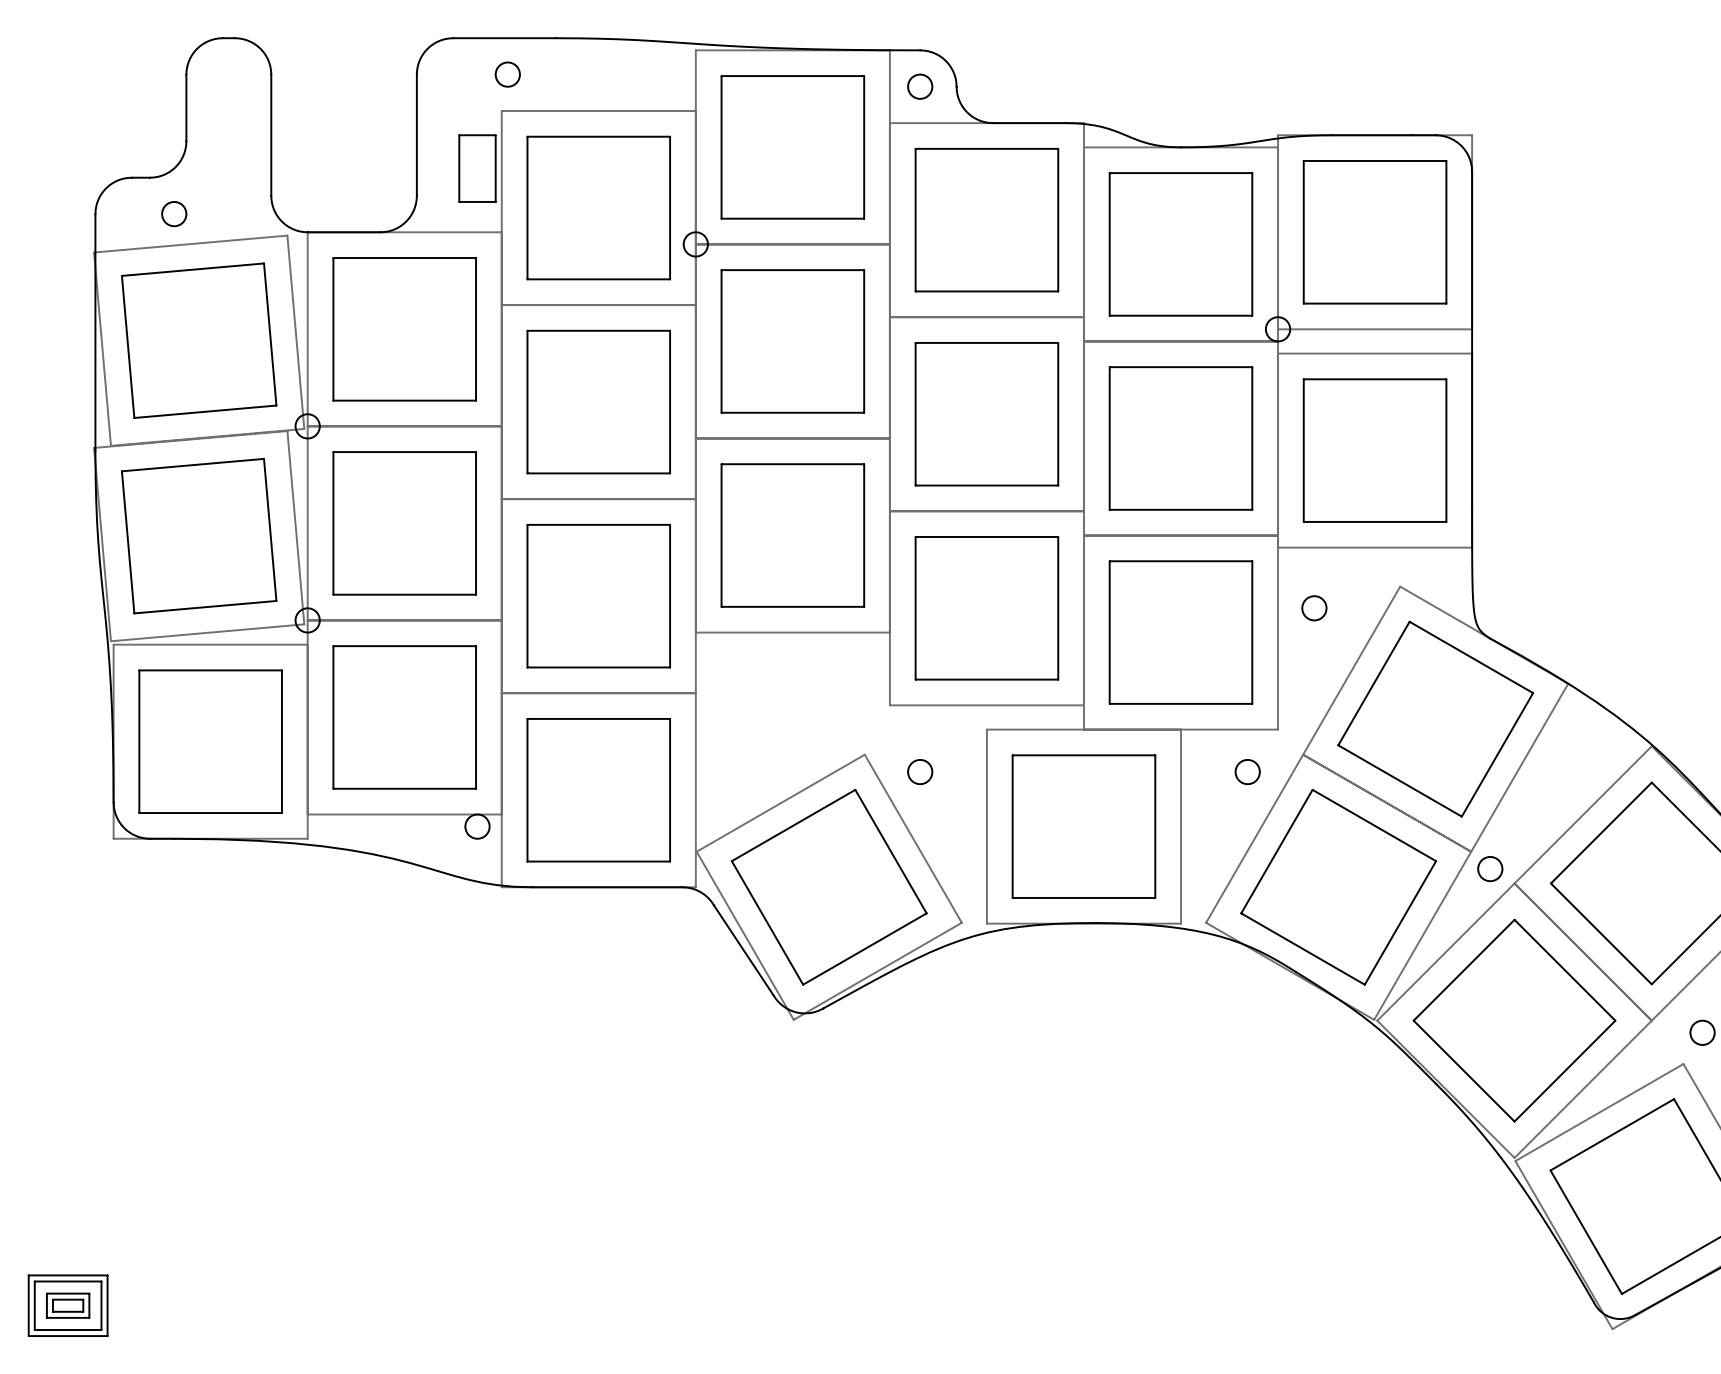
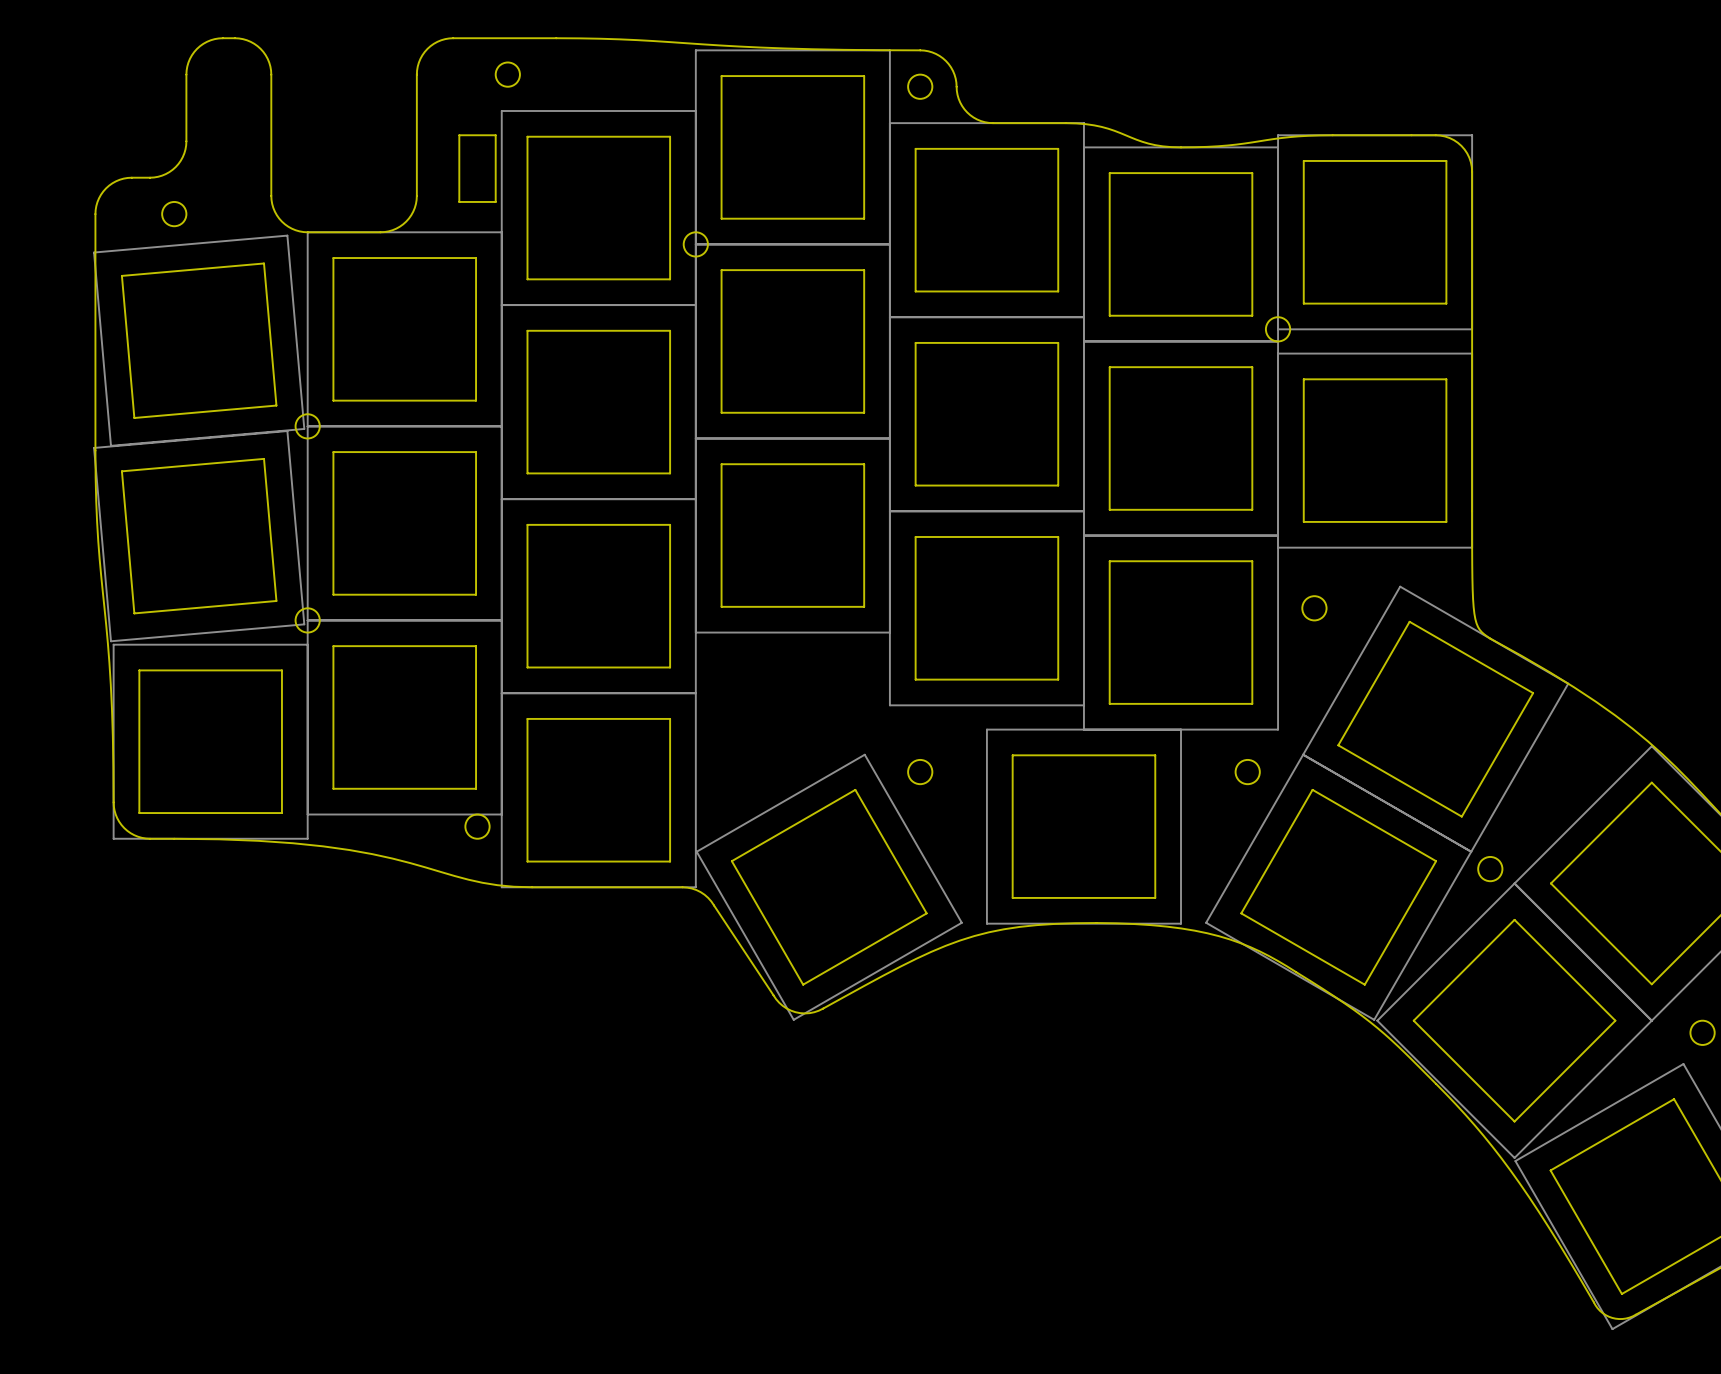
board edge: (28, 1275) (107, 1275) (107, 1336) (28, 1336) (28, 1275) -> none
board edge: (34, 1281) (101, 1281) (101, 1330) (34, 1330) (34, 1281) -> none
board edge: (46, 1293) (89, 1293) (89, 1317) (46, 1317) (46, 1293) -> none
board edge: (52, 1299) (83, 1299) (83, 1311) (52, 1311) (52, 1299) -> none

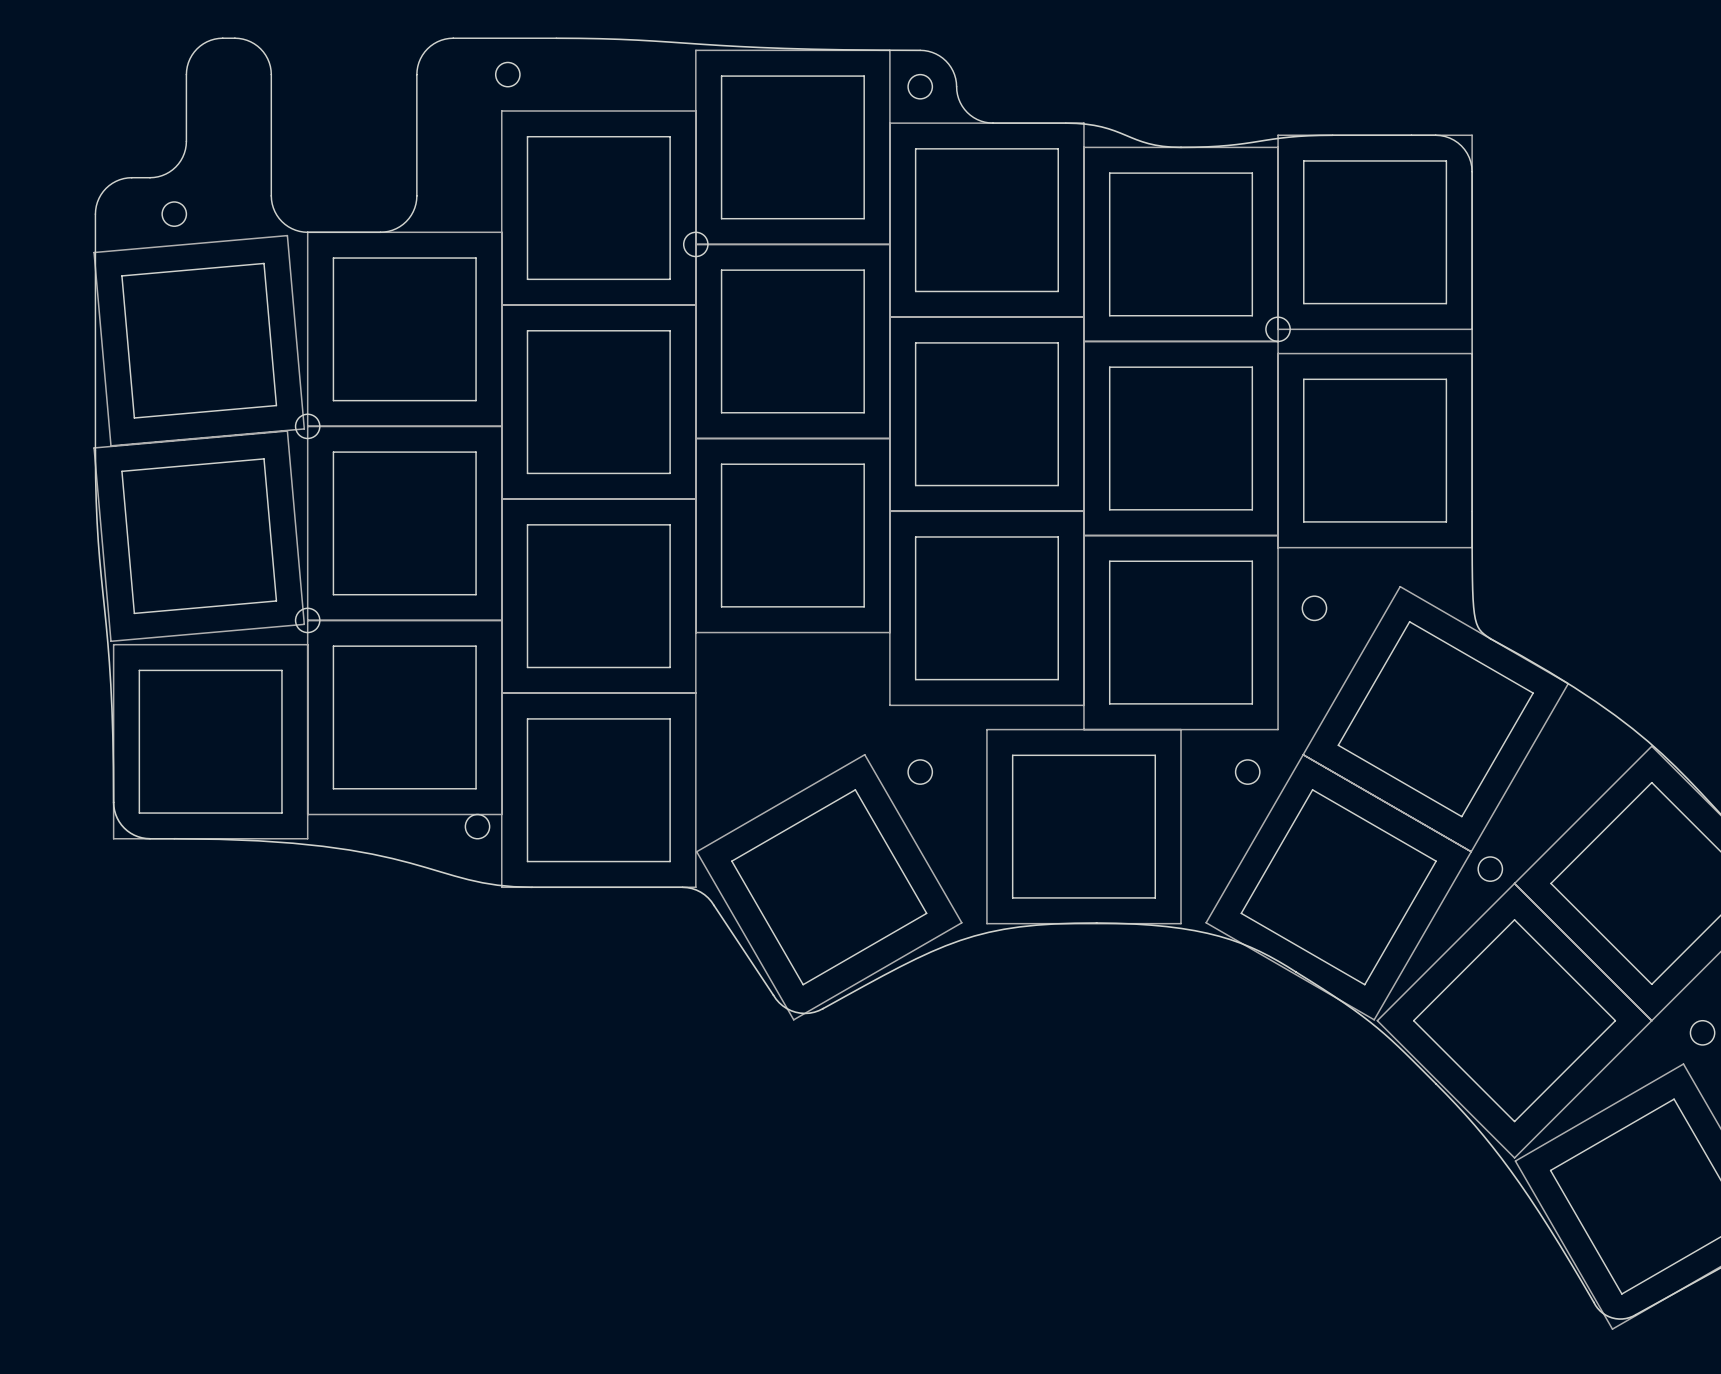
board edge: (459, 135) (495, 135) (495, 201) (459, 201) (459, 135) -> none

